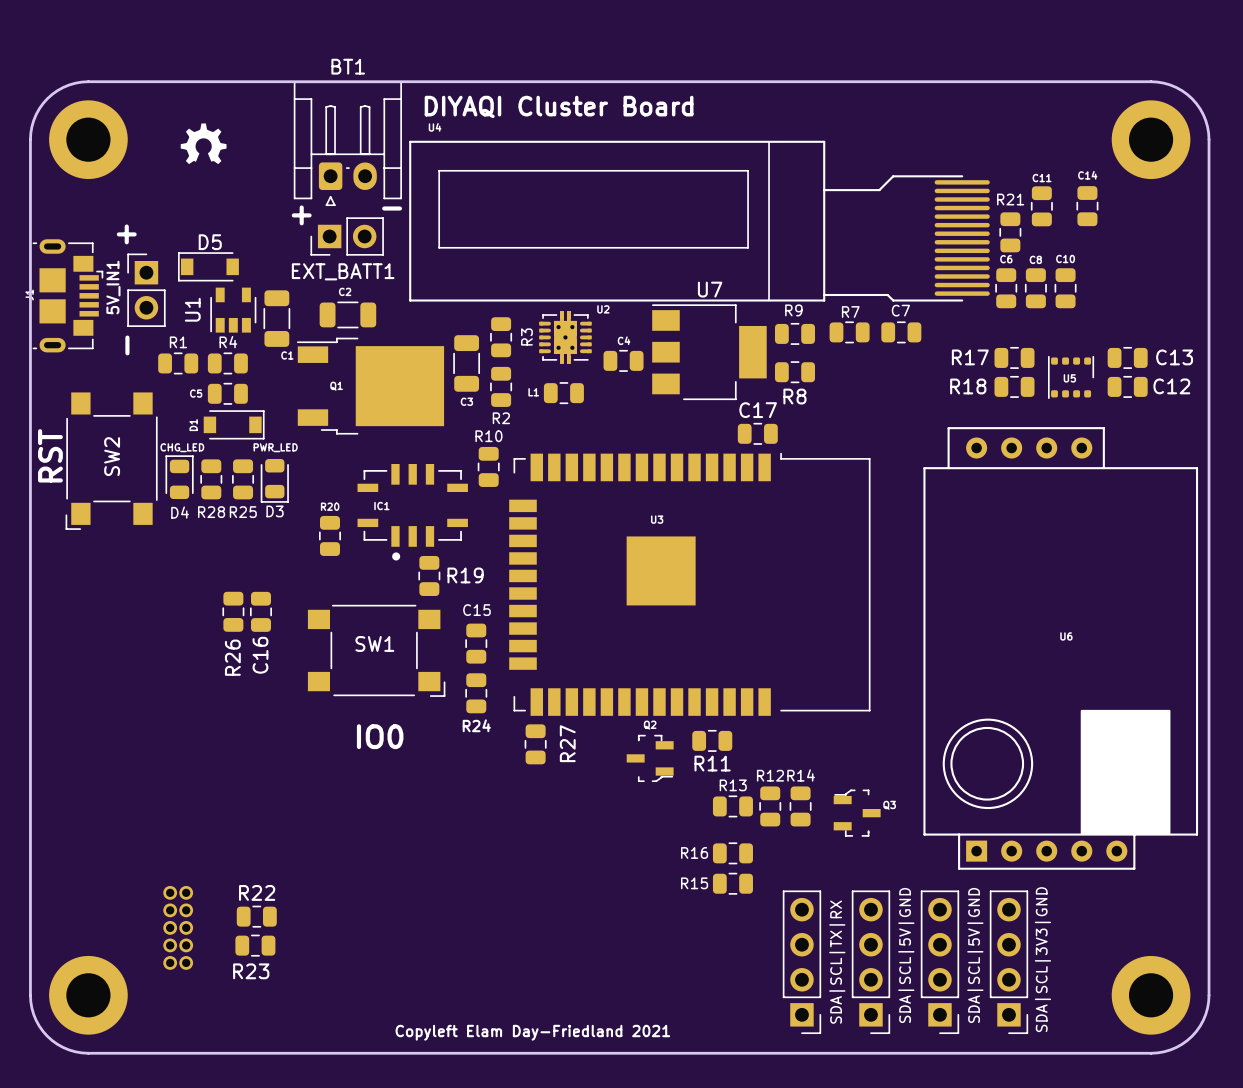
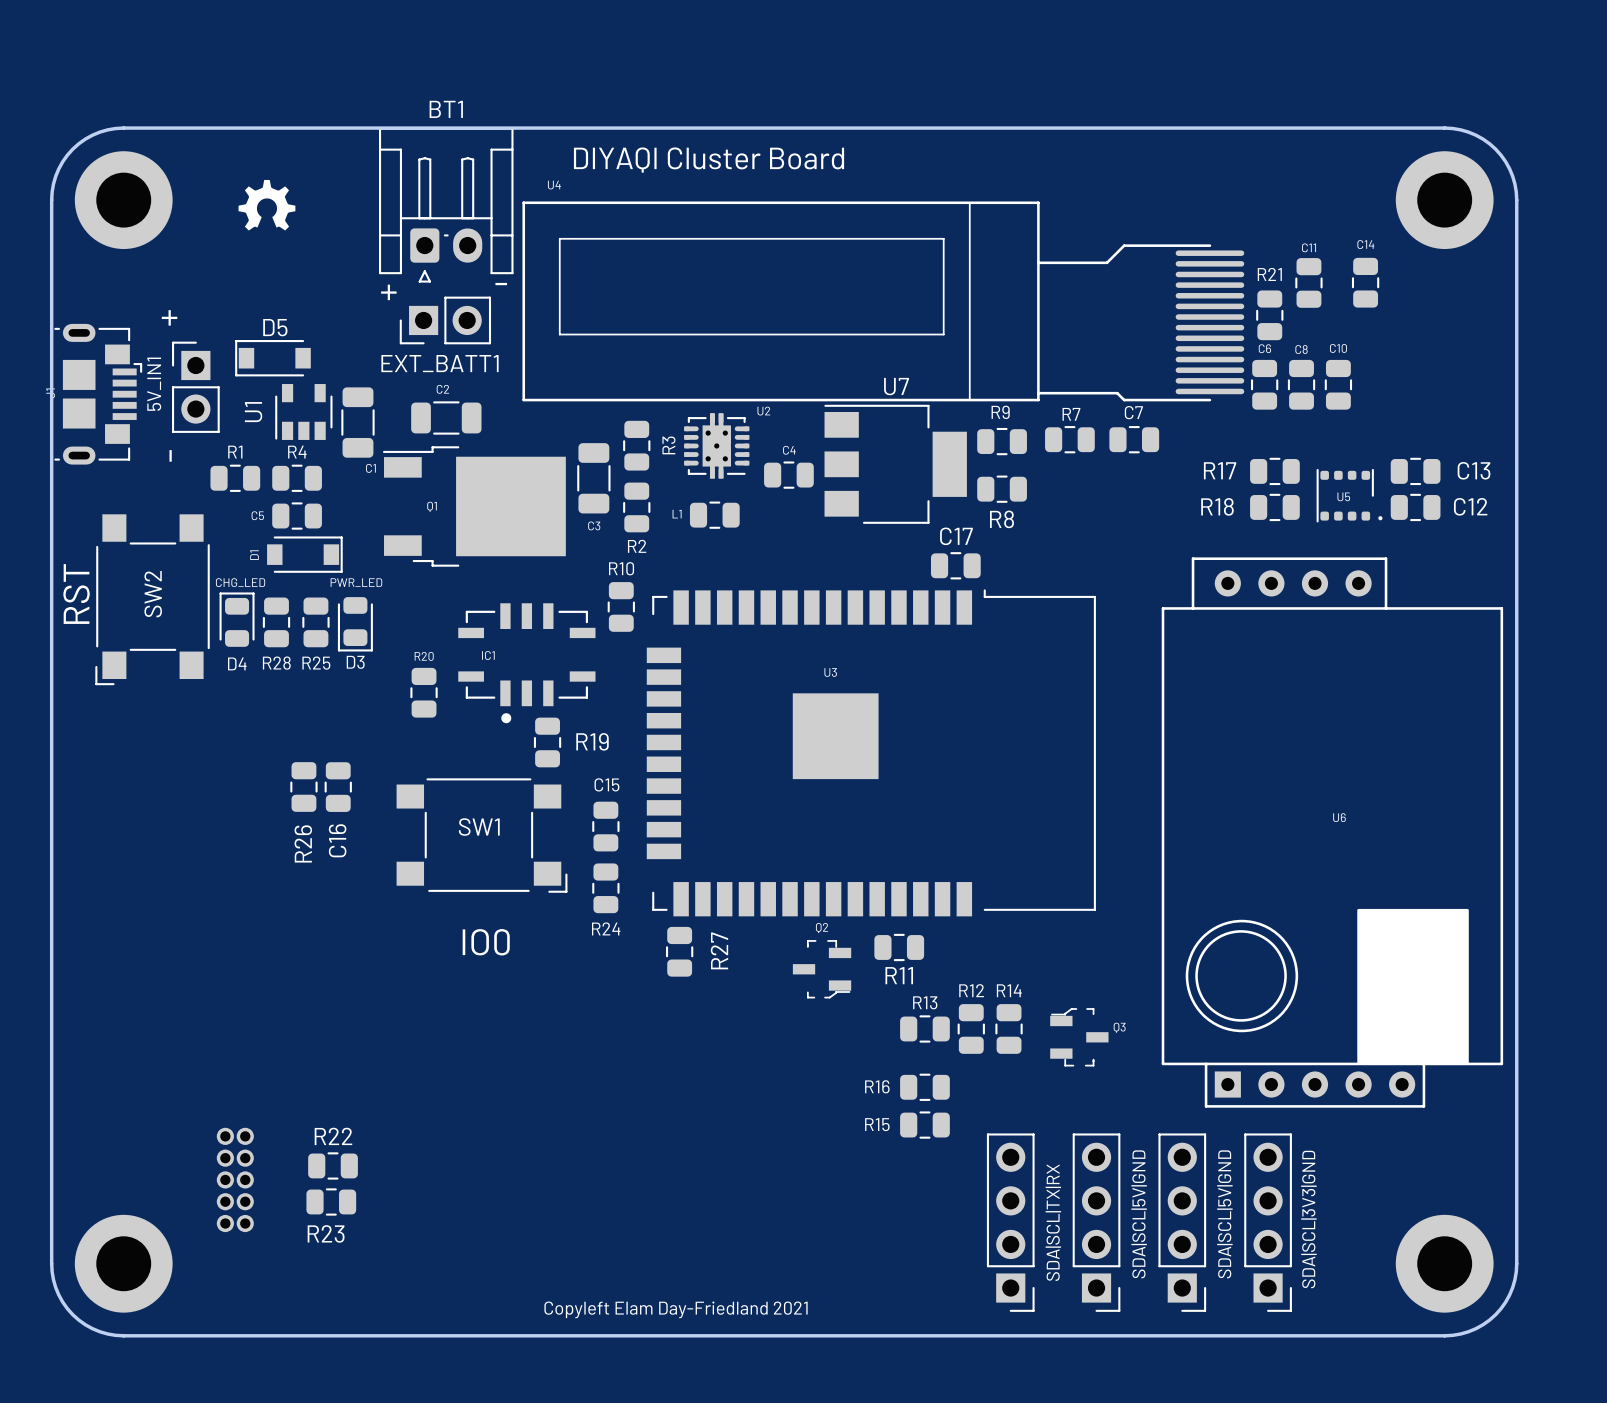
text: none -> . (1380, 518)

